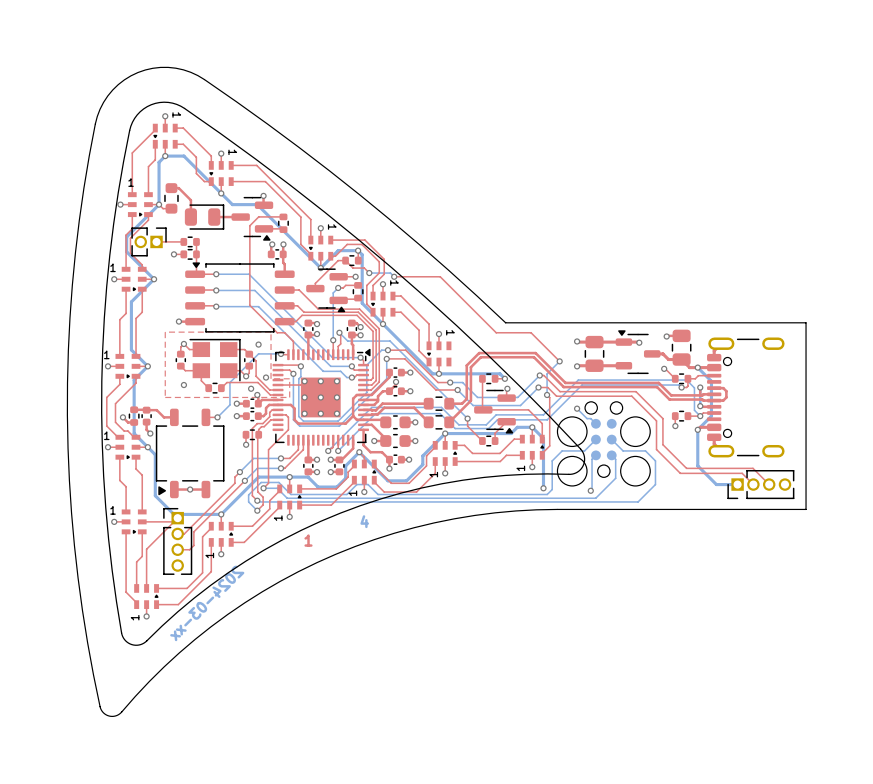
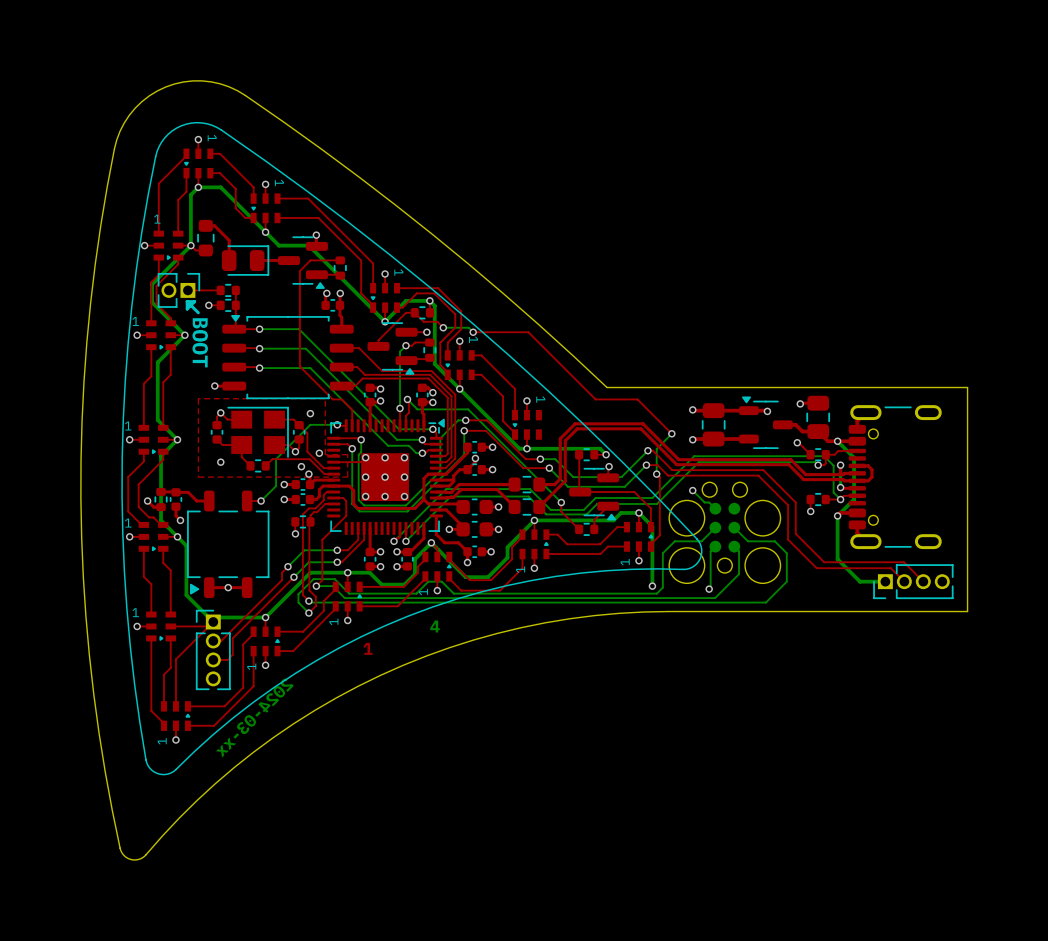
line: none -> (187, 301) (187, 309) (194, 301) (187, 301)
line: none -> (187, 301) (198, 312)
text: none -> BOOT (200, 342)

